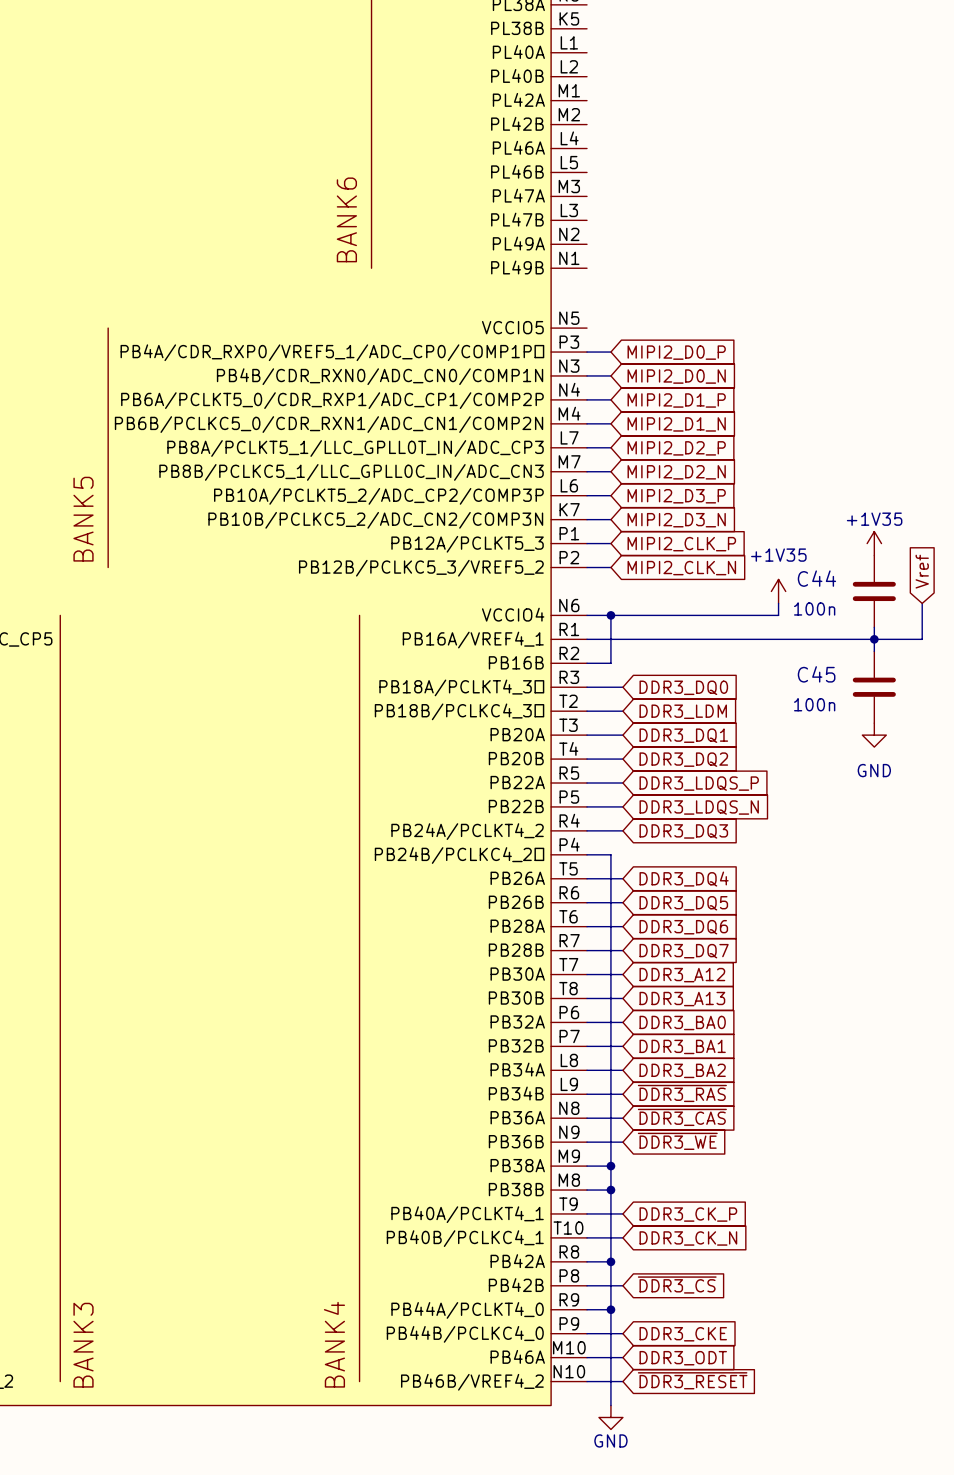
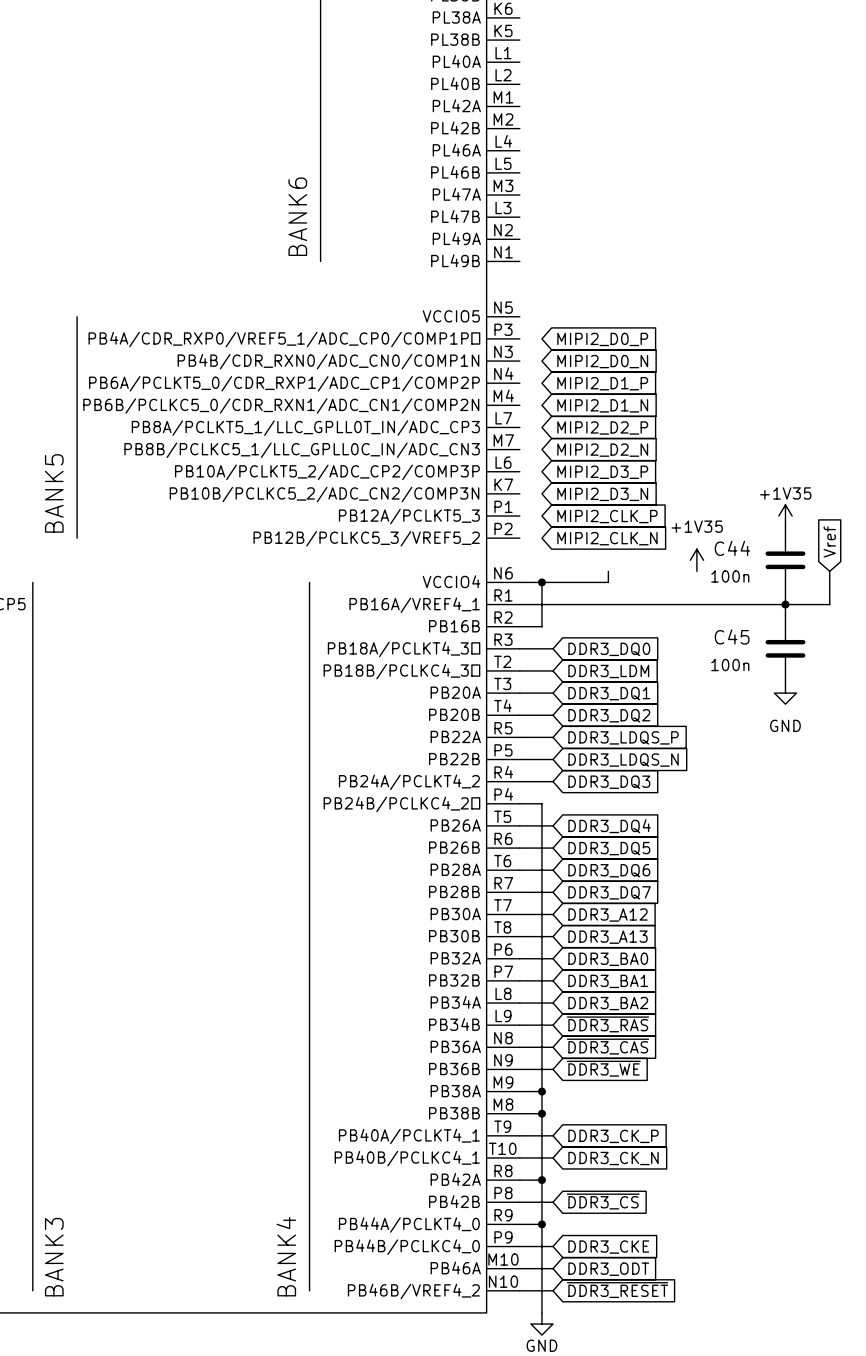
wire: (587, 352) (610, 352) -> none
wire: (587, 375) (610, 375) -> none
wire: (587, 399) (610, 399) -> none
wire: (587, 423) (610, 423) -> none
wire: (587, 447) (610, 447) -> none
wire: (587, 471) (610, 471) -> none
wire: (587, 495) (610, 495) -> none
wire: (587, 519) (610, 519) -> none
wire: (587, 543) (610, 543) -> none
wire: (587, 567) (610, 567) -> none
wire: (778, 603) (778, 615) (682, 615) -> (608, 571) (608, 582)

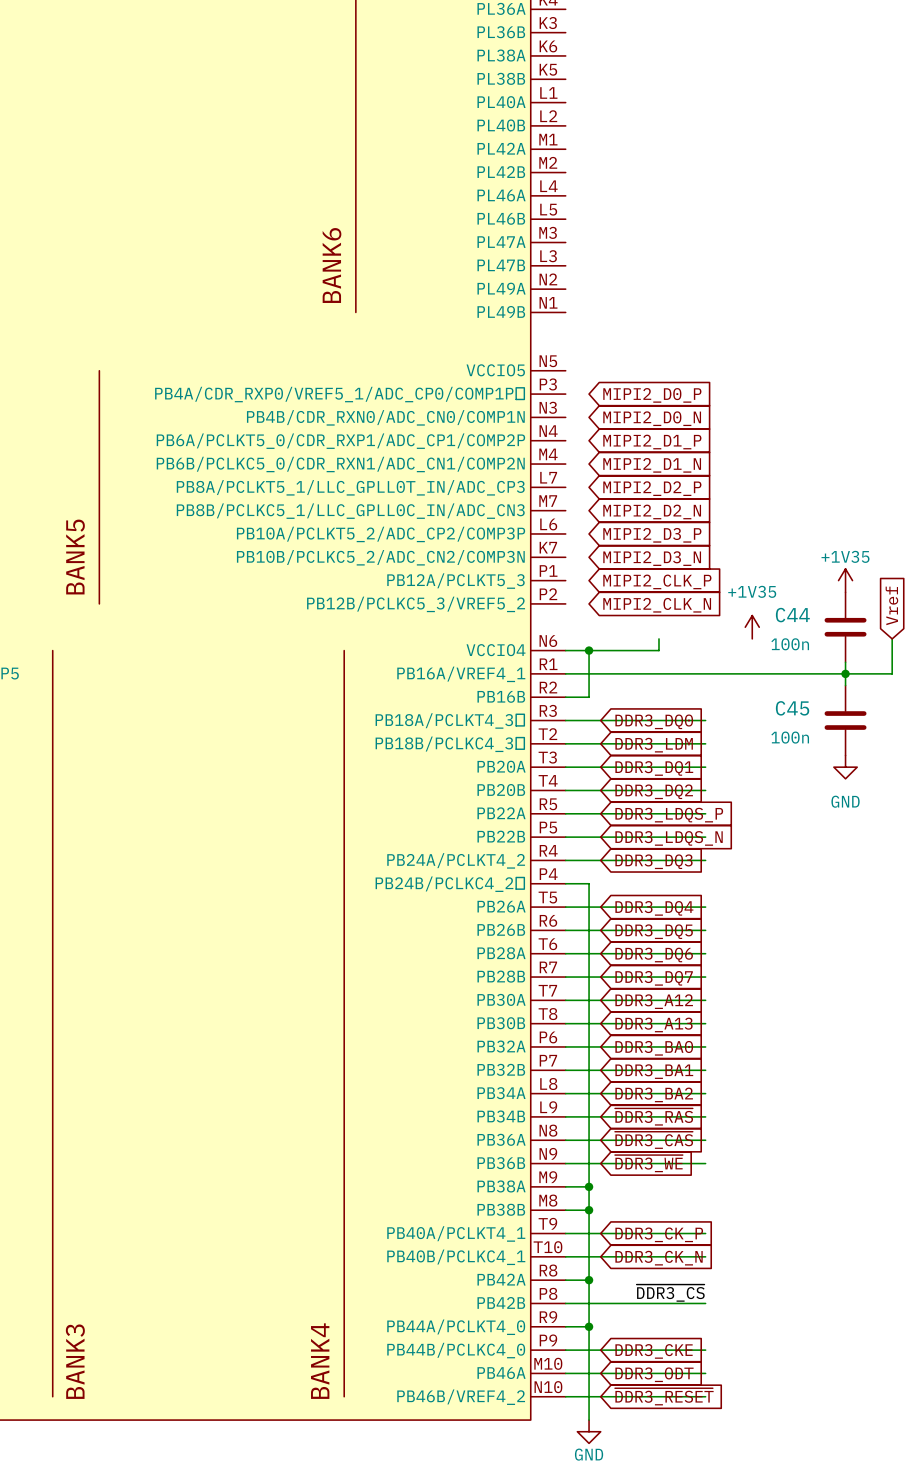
wire: none -> (600, 720) (705, 720)
wire: none -> (600, 743) (705, 743)
wire: none -> (600, 767) (705, 767)
wire: none -> (600, 790) (705, 790)
wire: none -> (600, 813) (705, 813)
wire: none -> (600, 837) (705, 837)
wire: none -> (600, 860) (705, 860)
wire: none -> (600, 907) (705, 907)
wire: none -> (600, 930) (705, 930)
wire: none -> (600, 953) (705, 953)
wire: none -> (600, 977) (705, 977)
wire: none -> (600, 1000) (705, 1000)
wire: none -> (600, 1023) (705, 1023)
wire: none -> (600, 1046) (705, 1046)
wire: none -> (600, 1070) (705, 1070)
wire: none -> (600, 1093) (705, 1093)
wire: none -> (600, 1116) (705, 1116)
wire: none -> (600, 1140) (705, 1140)
wire: none -> (600, 1163) (705, 1163)
wire: none -> (600, 1233) (705, 1233)
wire: none -> (600, 1256) (705, 1256)
label: none -> ~{DDR3_CS} (670, 1293)
global label: ~{DDR3_CS} (603, 1201) -> none
wire: none -> (600, 1303) (705, 1303)
wire: none -> (600, 1350) (705, 1350)
wire: none -> (600, 1373) (705, 1373)
wire: none -> (600, 1396) (705, 1396)

